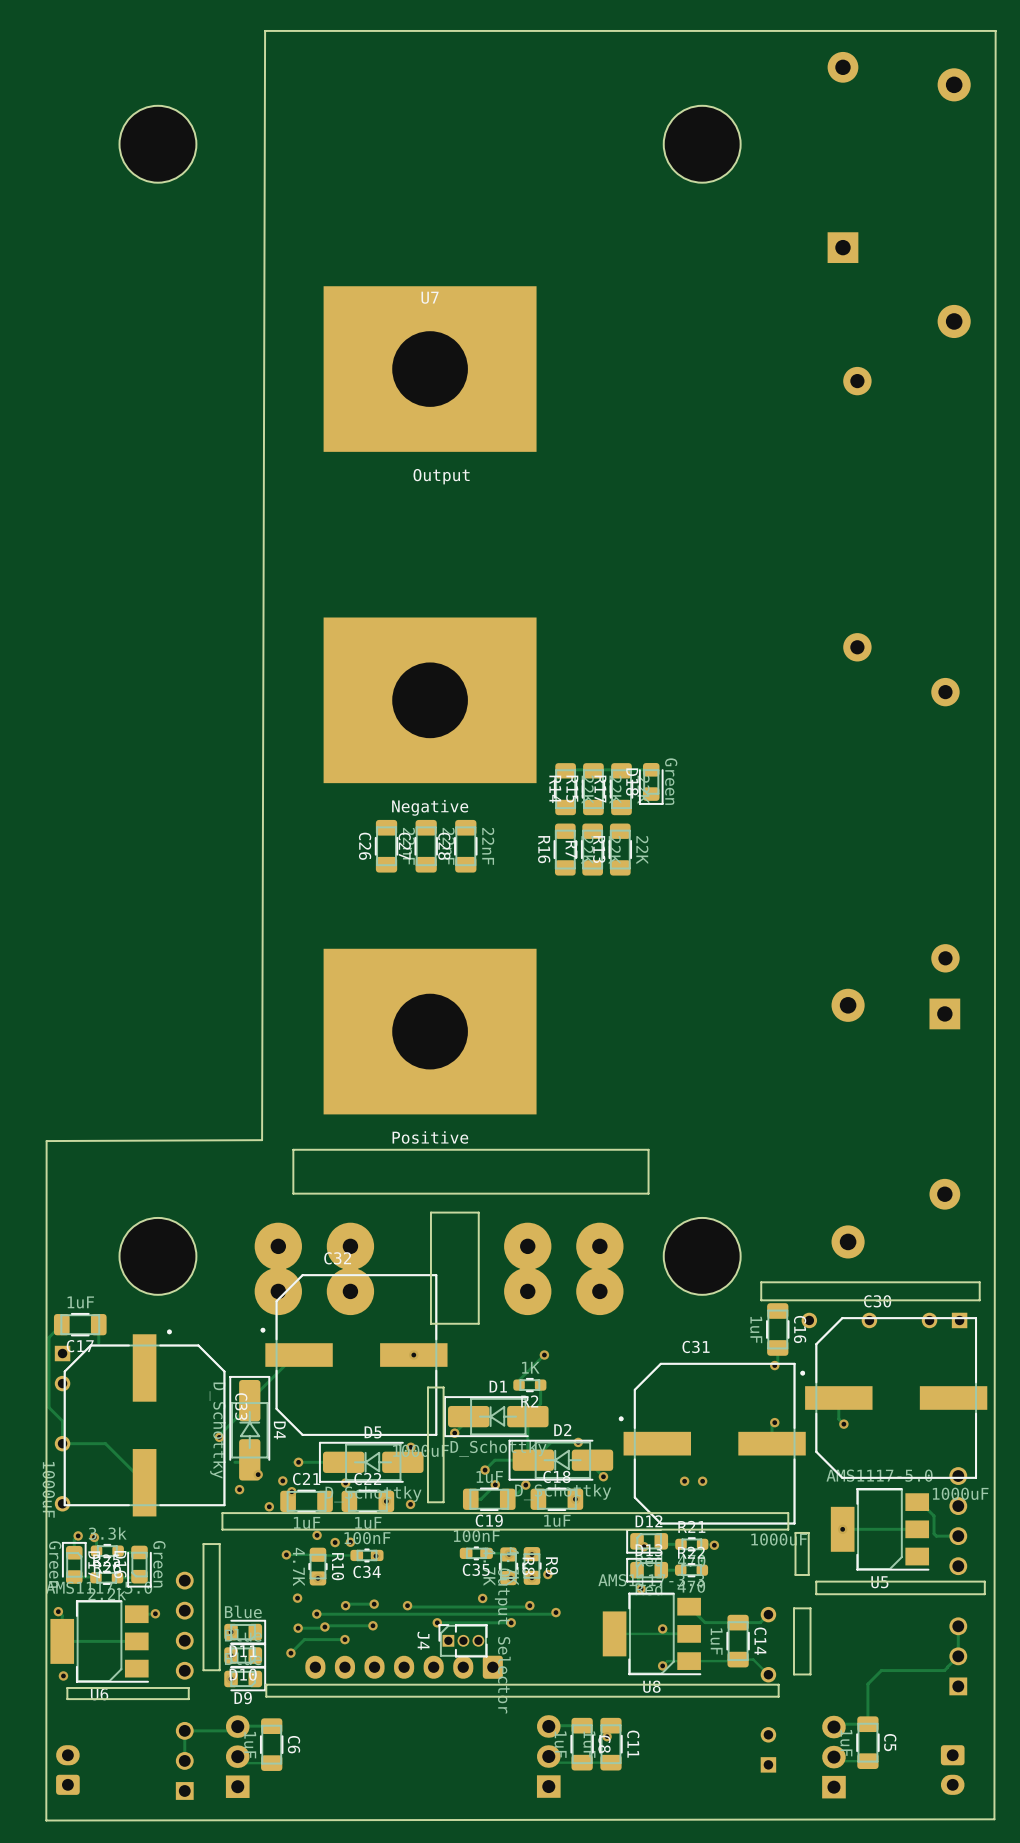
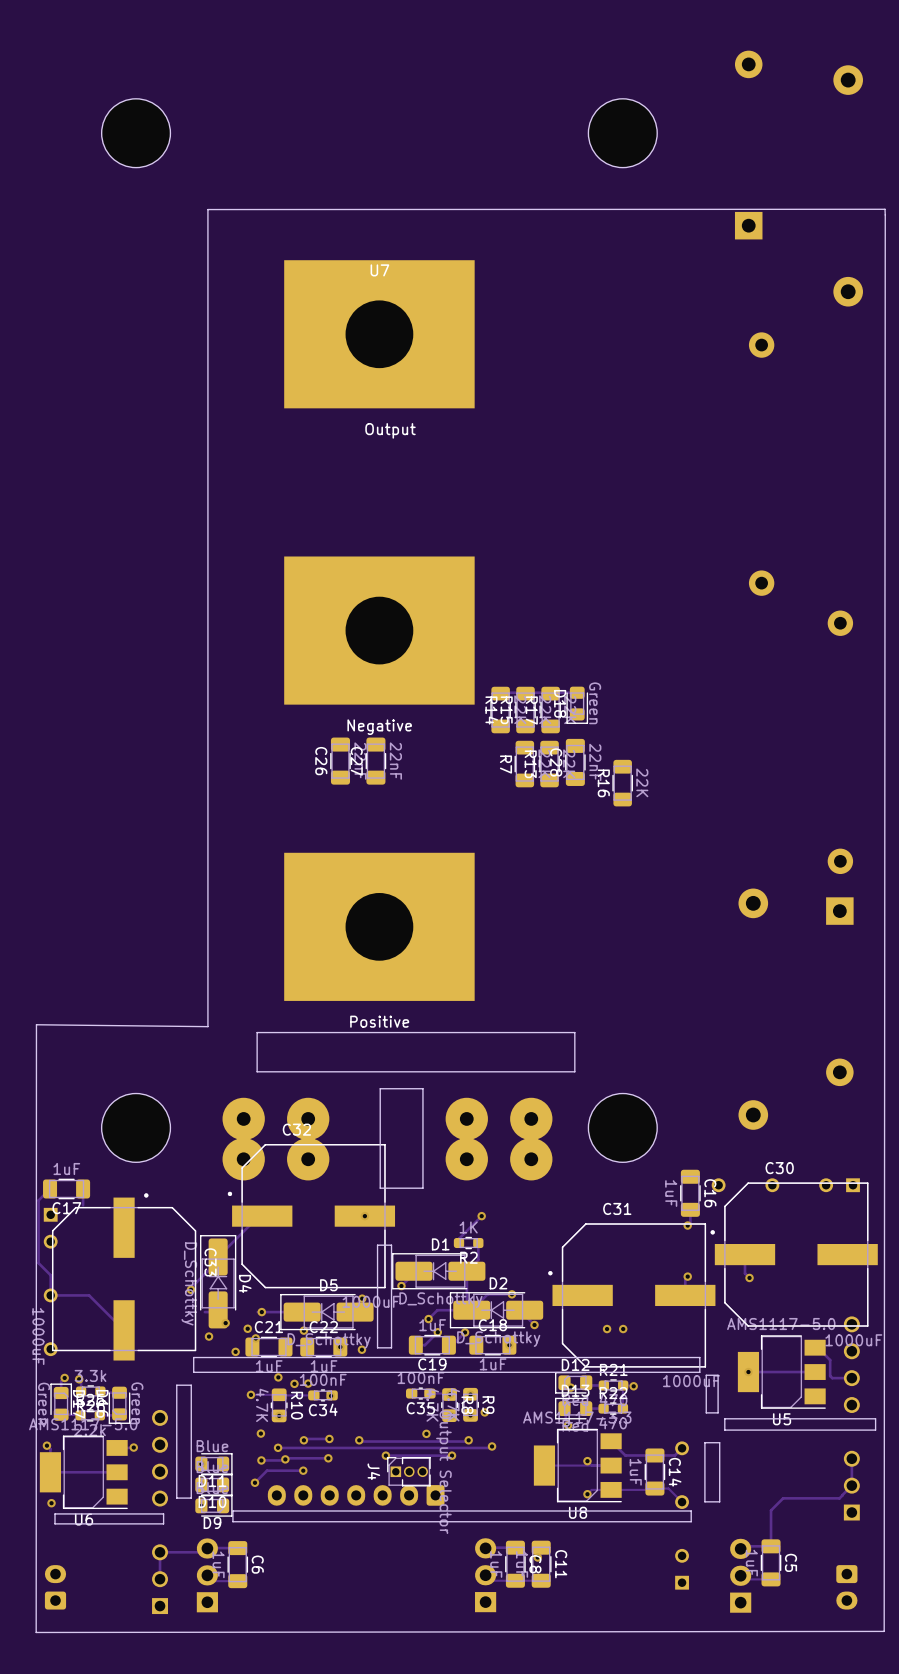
C28 position: (465, 846) -> (575, 762)
R16 position: (565, 849) -> (622, 783)
board edge: (46, 1141) (262, 1140) (265, 30) (995, 30) (994, 1819) -> (36, 1024) (207, 1026) (207, 209) (885, 209) (884, 1631)
board edge: (979, 1282) (761, 1282) (761, 1300) (979, 1300) (979, 1282) -> none

